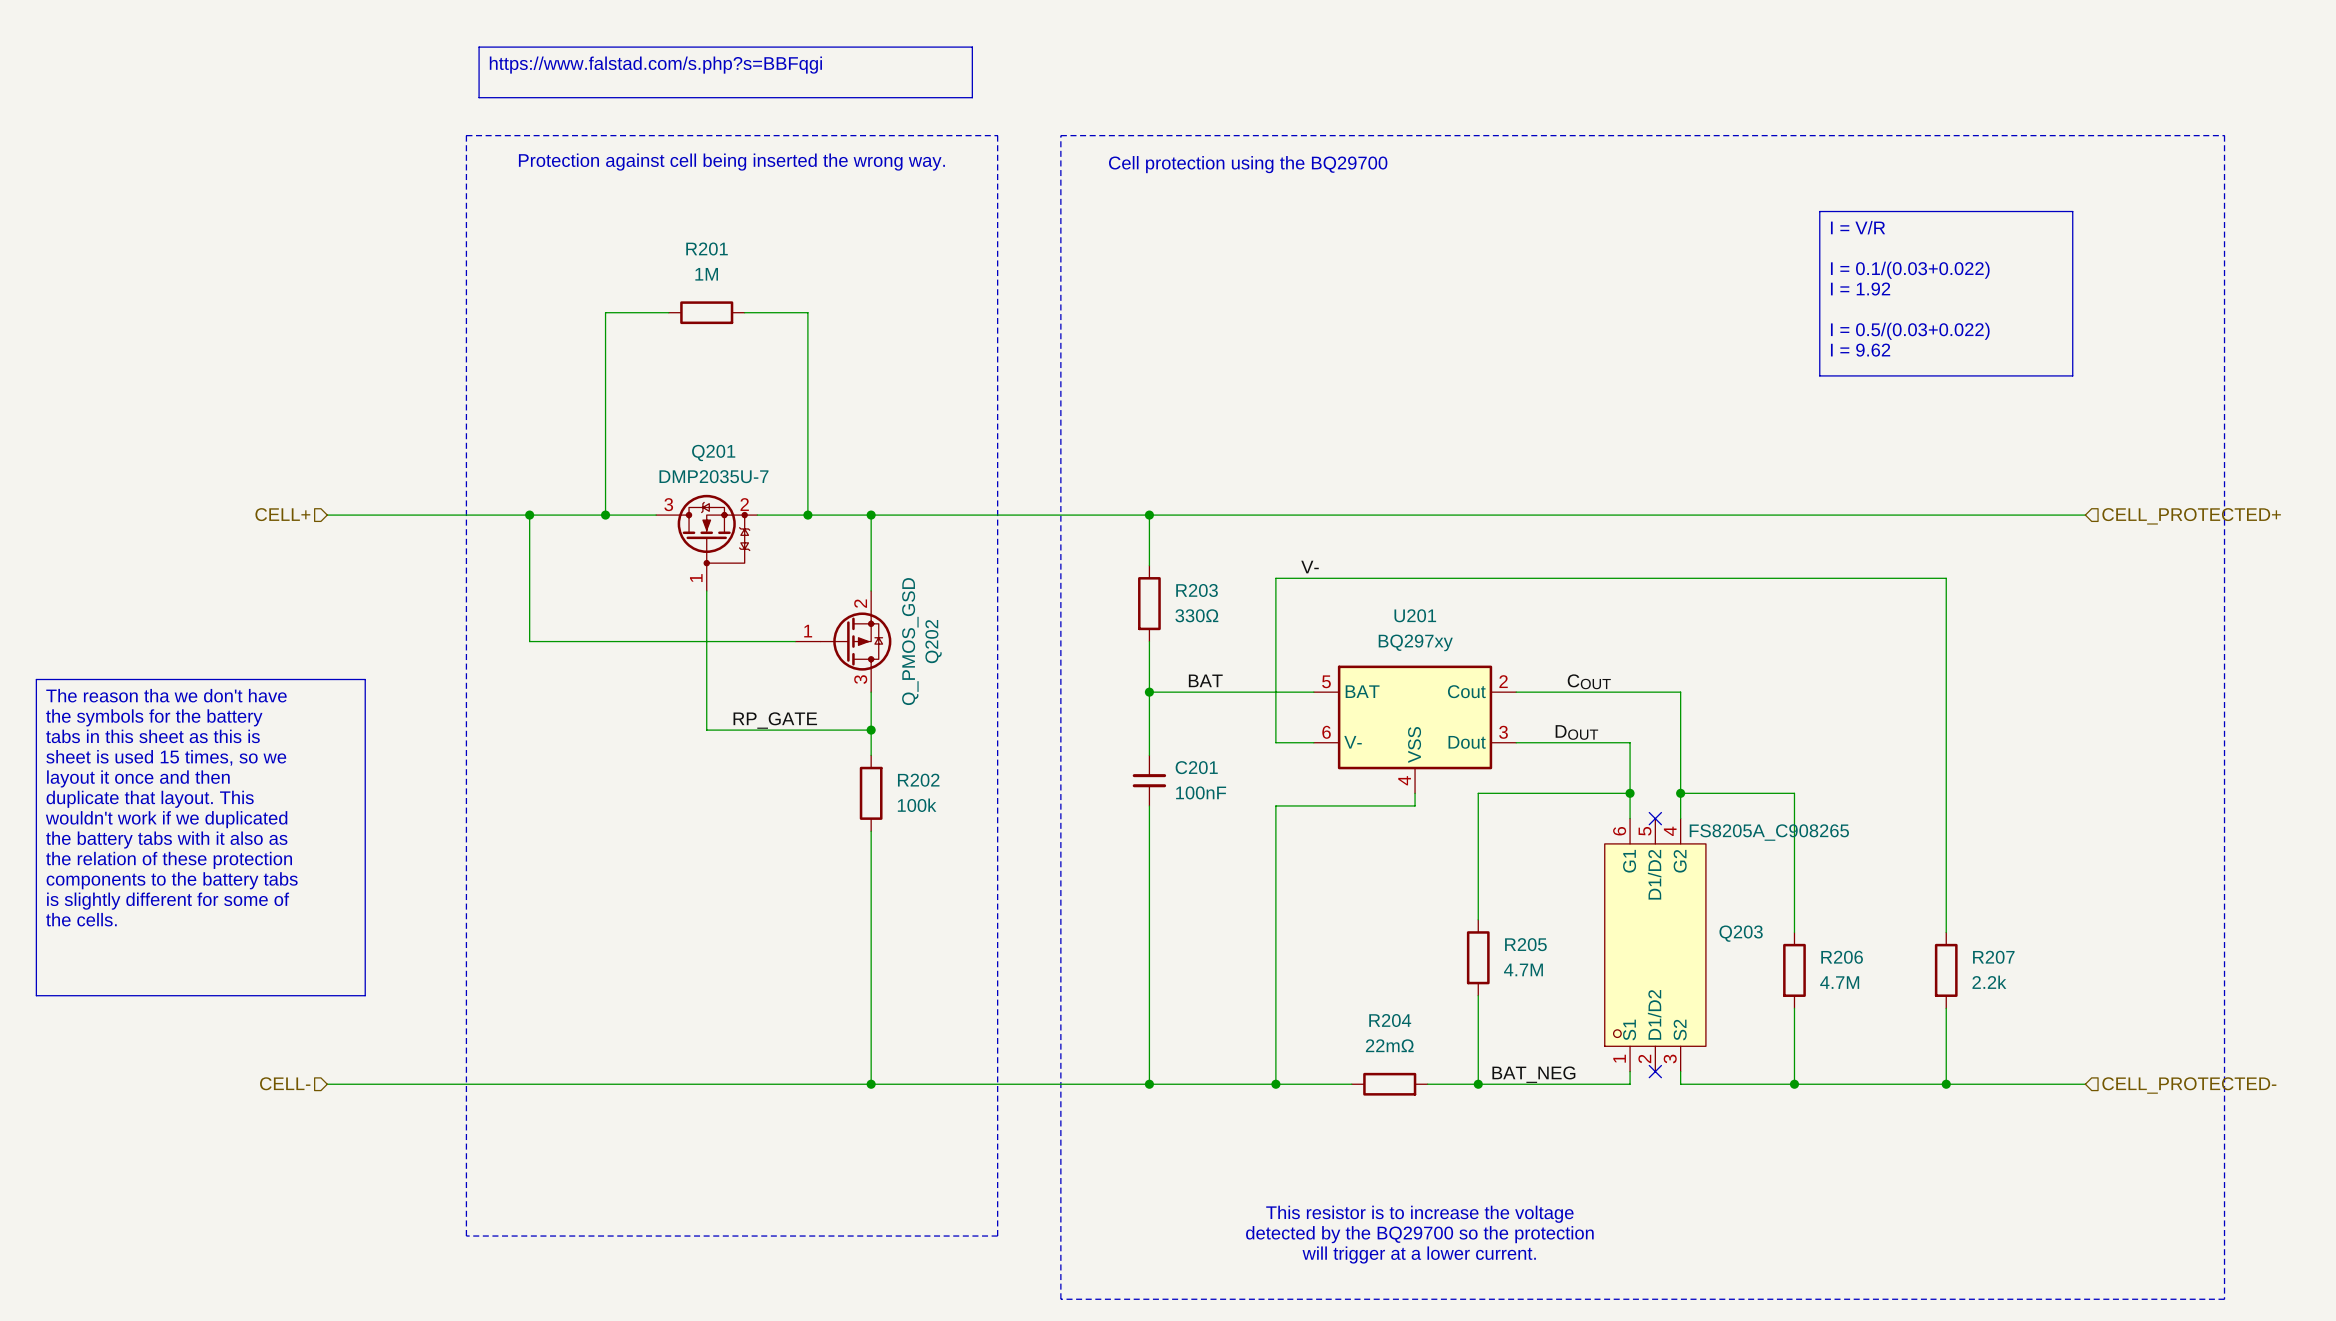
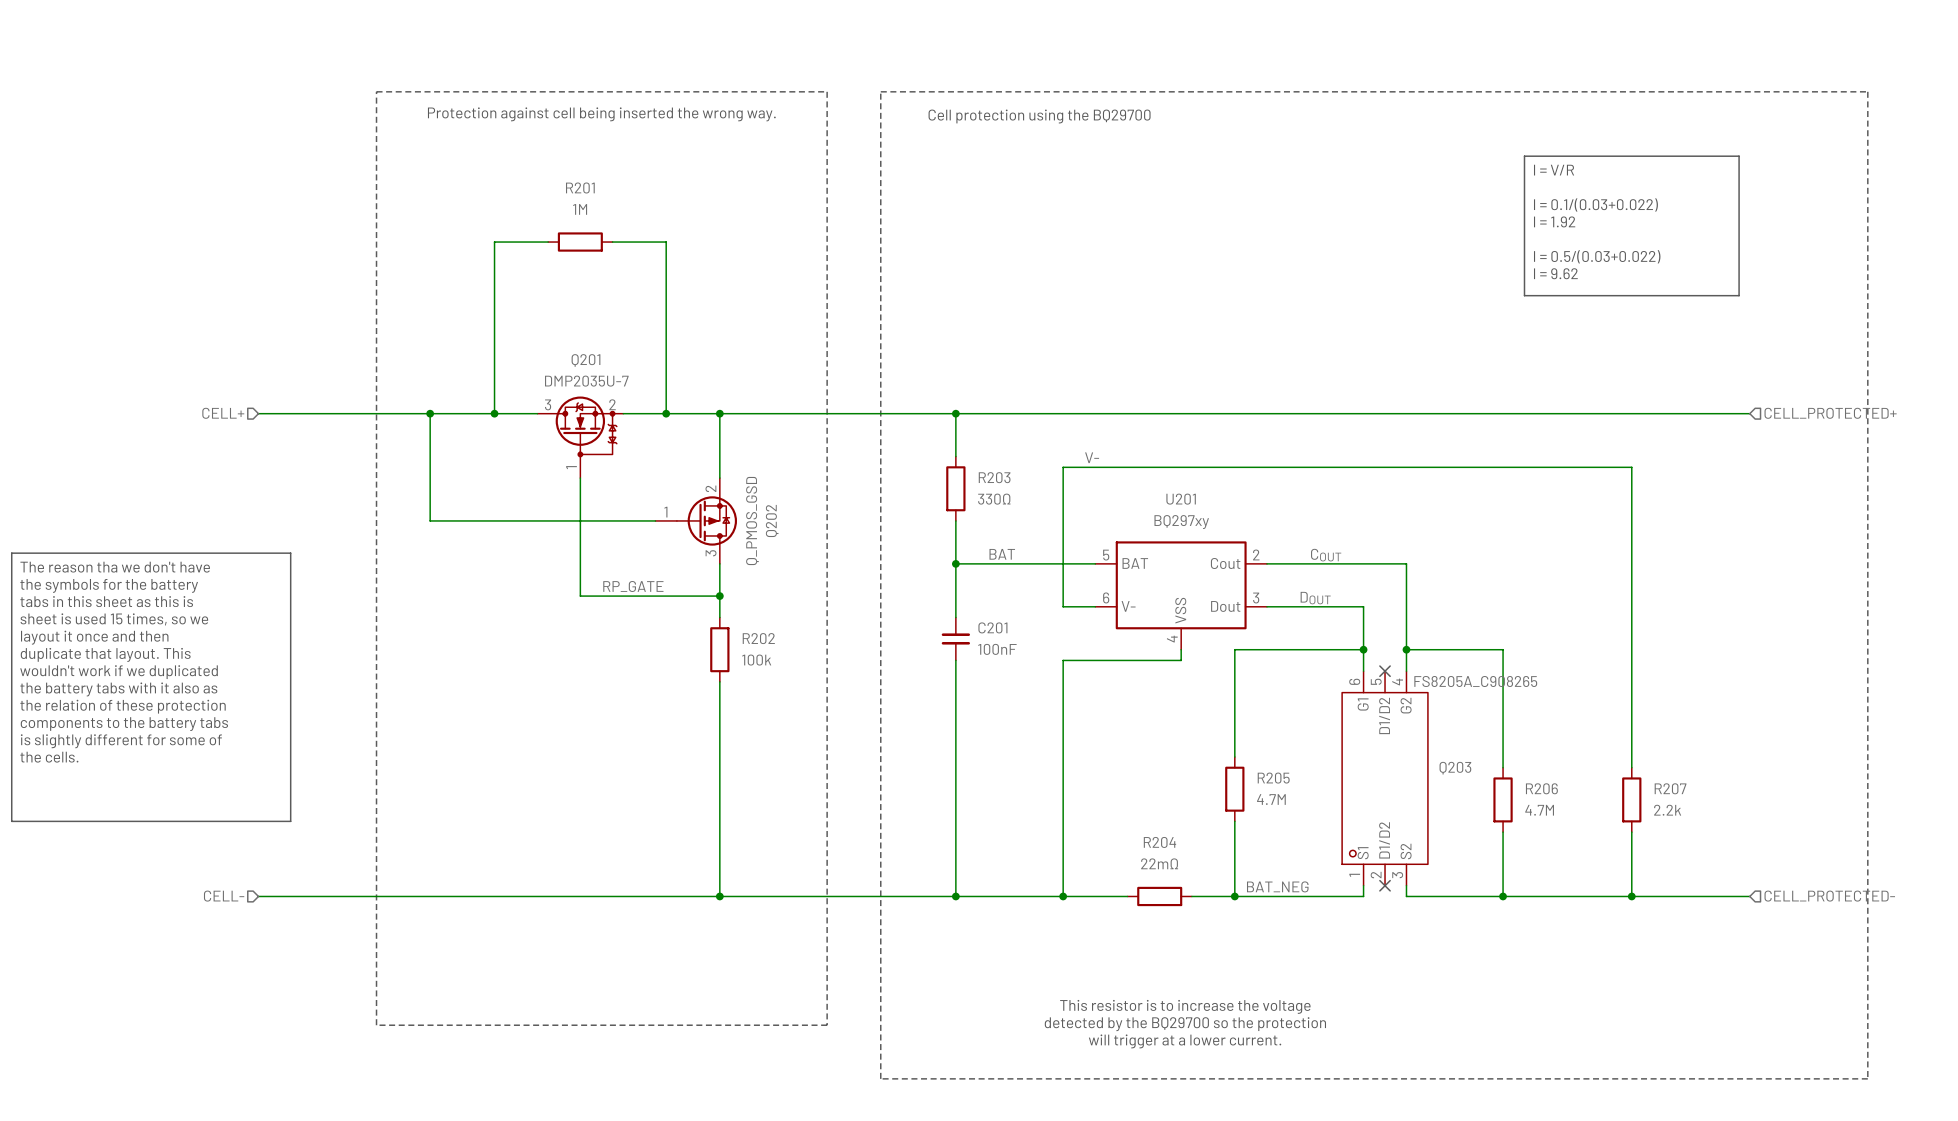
line: (479, 47) (972, 47) (972, 97) (479, 97) (479, 47) -> none
text: https://www.falstad.com/s.php?s=BBFqgi (655, 65) -> none

